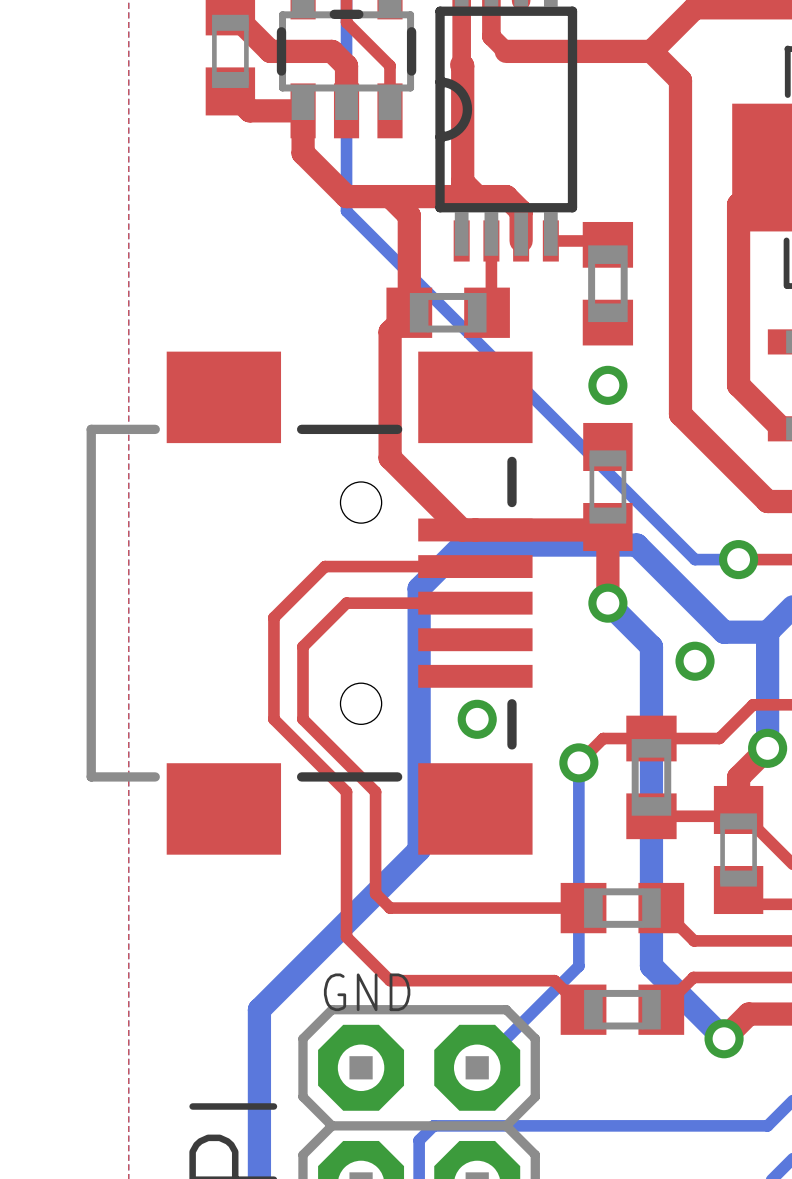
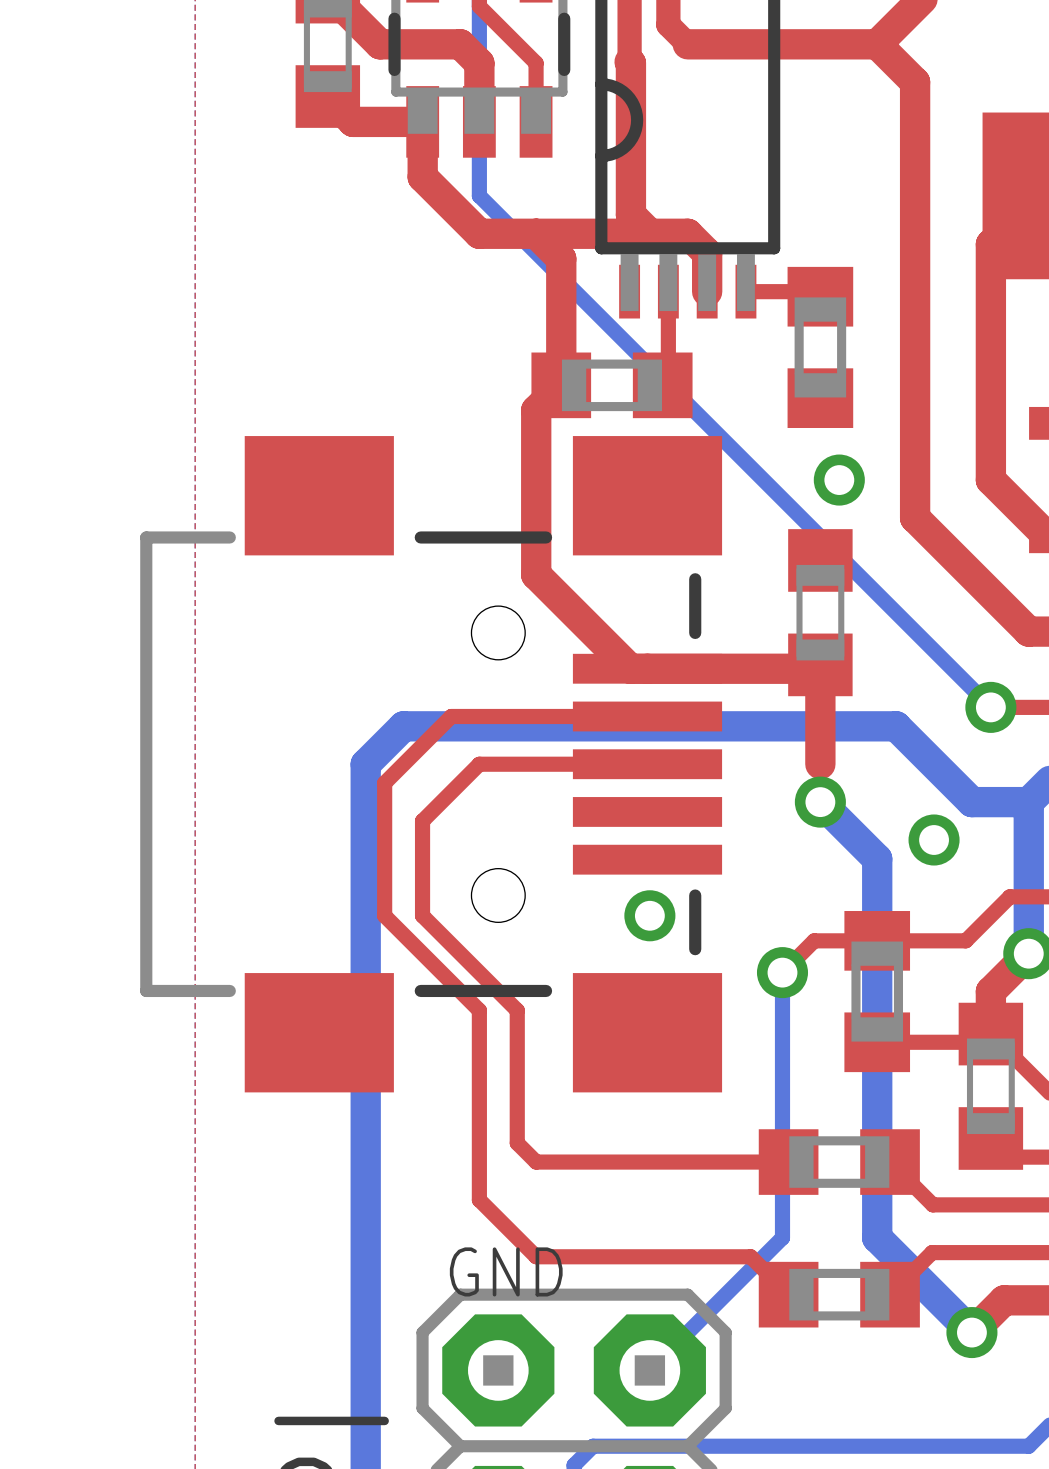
bottom track: (346, 167) (346, 211) (695, 559) (738, 559) -> (479, 195) (990, 707)
via position: (607, 385) -> (839, 480)
bottom track: (665, 574) (636, 545) (462, 545) (419, 588) (419, 849) (259, 1009) -> (896, 726) (403, 726) (365, 764) (365, 1294)
bottom track: (607, 603) (651, 646) (651, 675) -> (820, 802) (877, 858)
via position: (607, 603) -> (820, 802)

